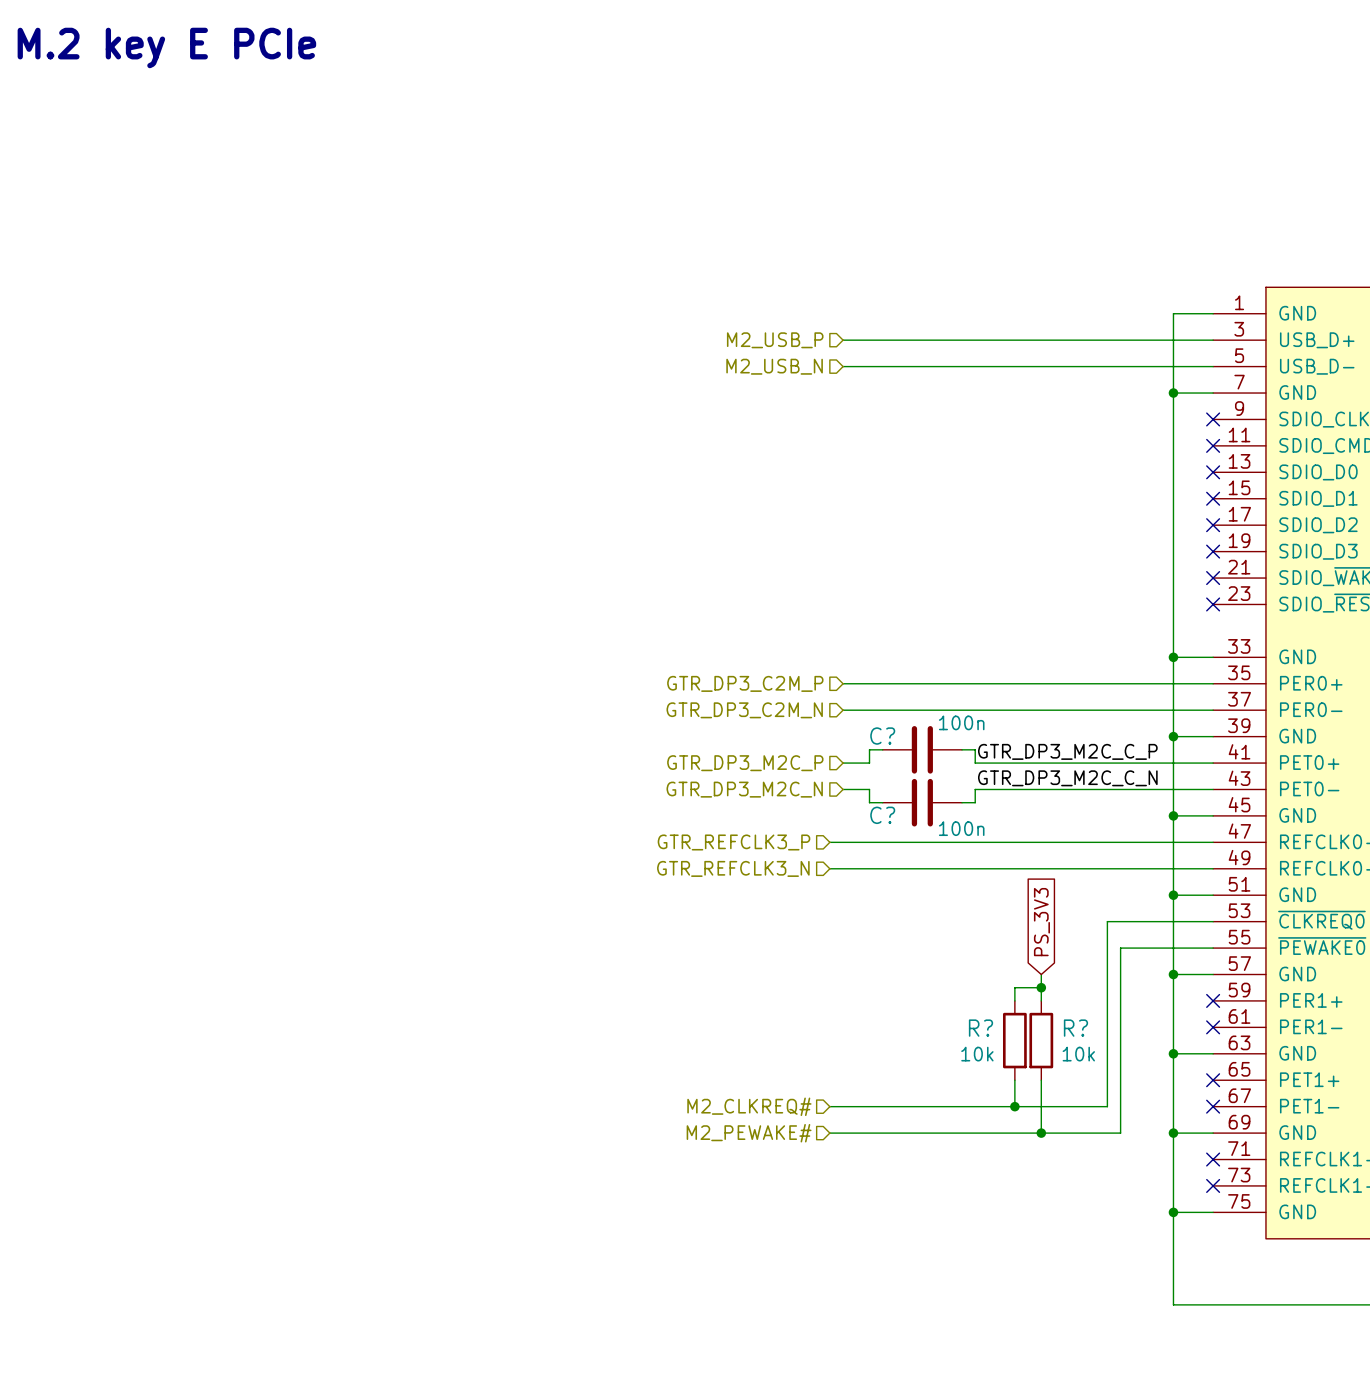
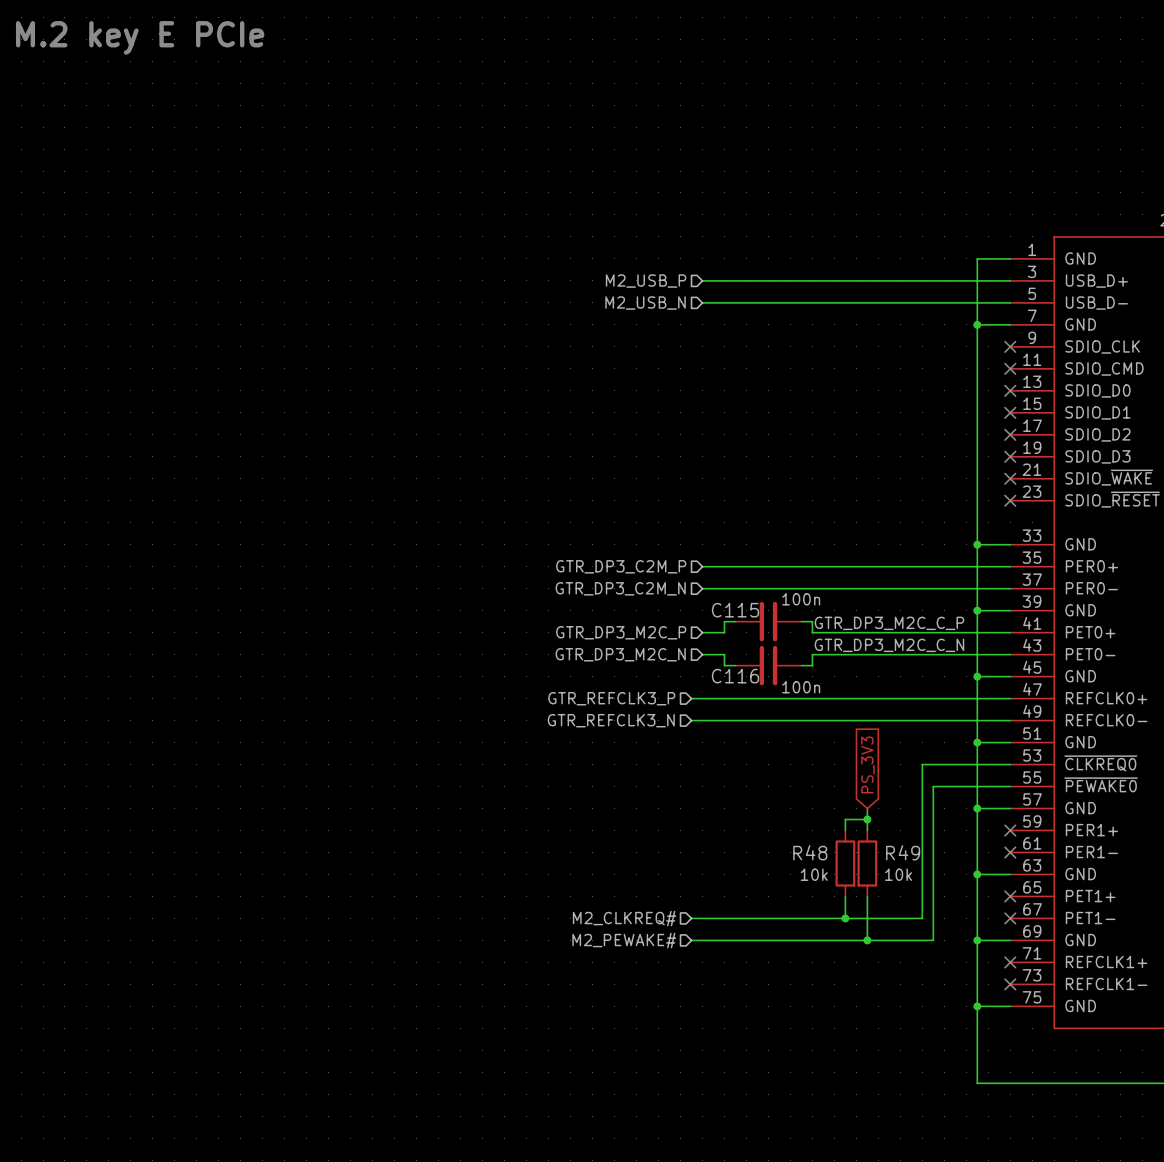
C? name: C? (882, 736) -> C115 (735, 610)
C? name: C? (882, 815) -> C116 (735, 676)
R? name: R? (980, 1028) -> R48 (810, 852)
R? name: R? (1075, 1028) -> R49 (903, 852)

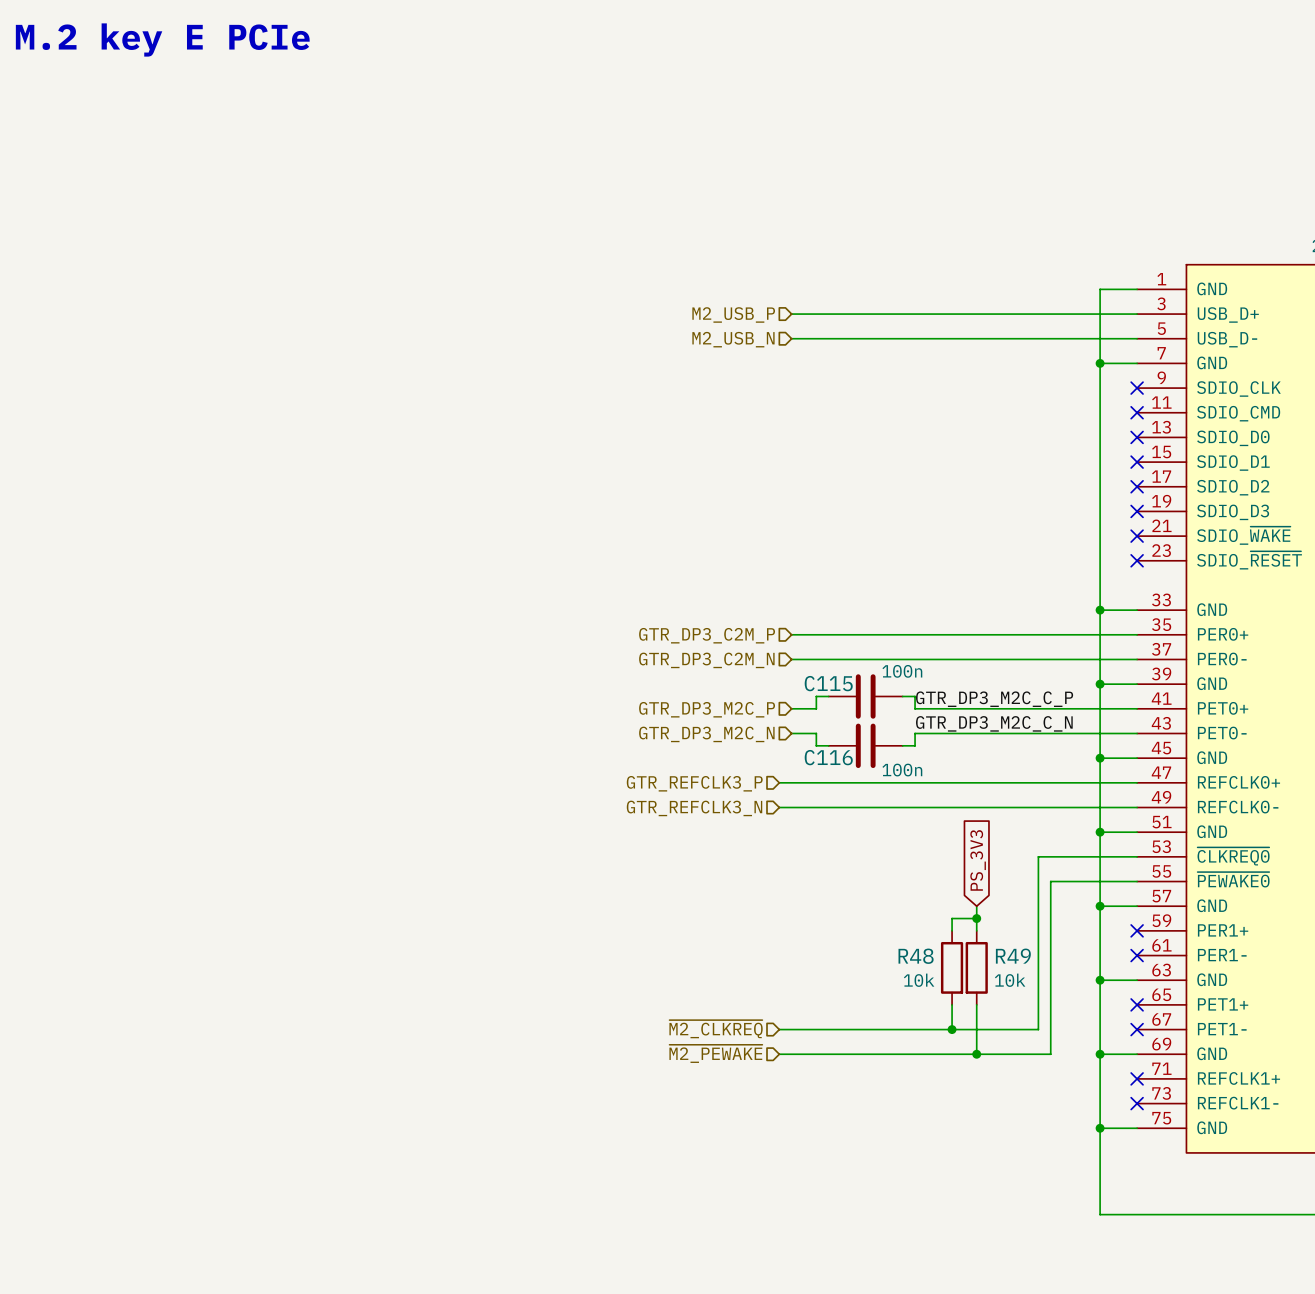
hierarchical label: M2_CLKREQ# (624, 918) -> ~{M2_CLKREQ} (716, 1029)
hierarchical label: M2_PEWAKE# (624, 940) -> ~{M2_PEWAKE} (715, 1053)

